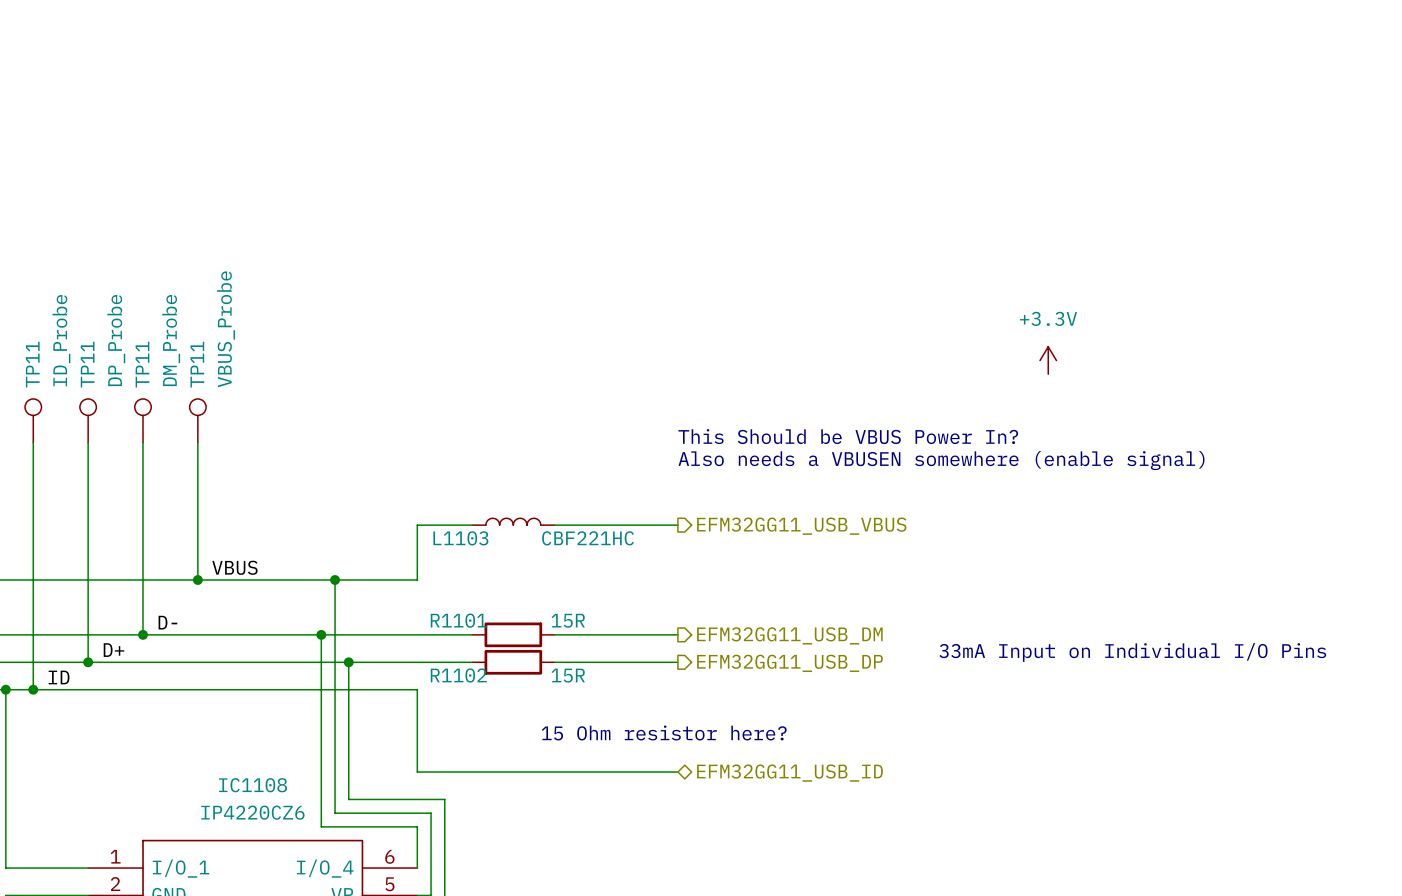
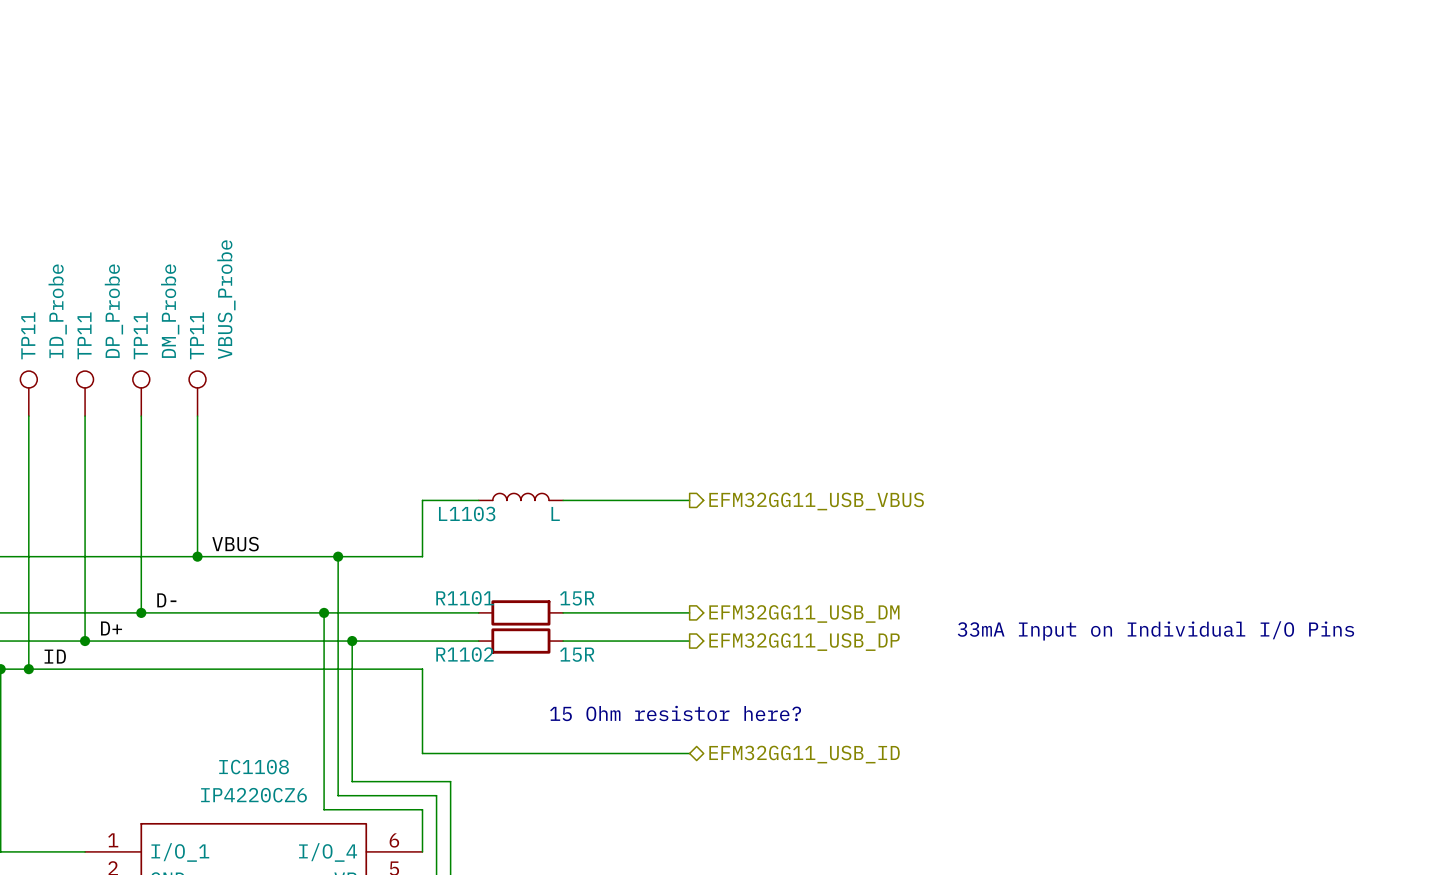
power symbol: +3.3V (1048, 360) -> none
text: This Should be VBUS Power In? (848, 436) -> none
text: Also needs a VBUSEN somewhere (enable signal) (941, 460) -> none
L1103 value: CBF221HC (588, 538) -> L (555, 513)

